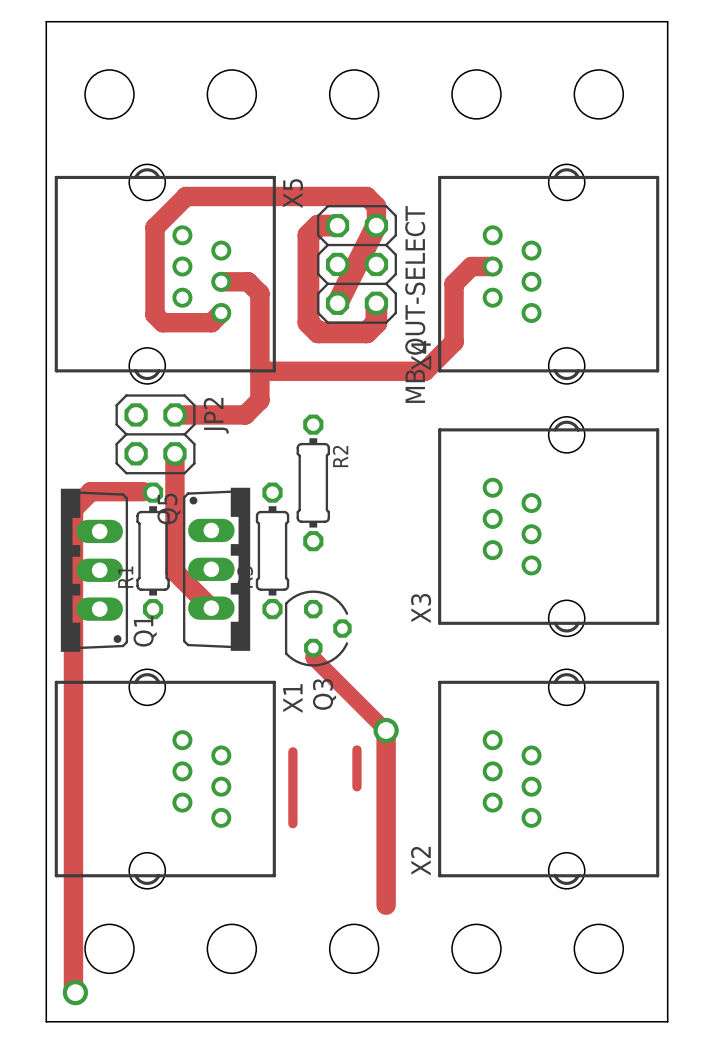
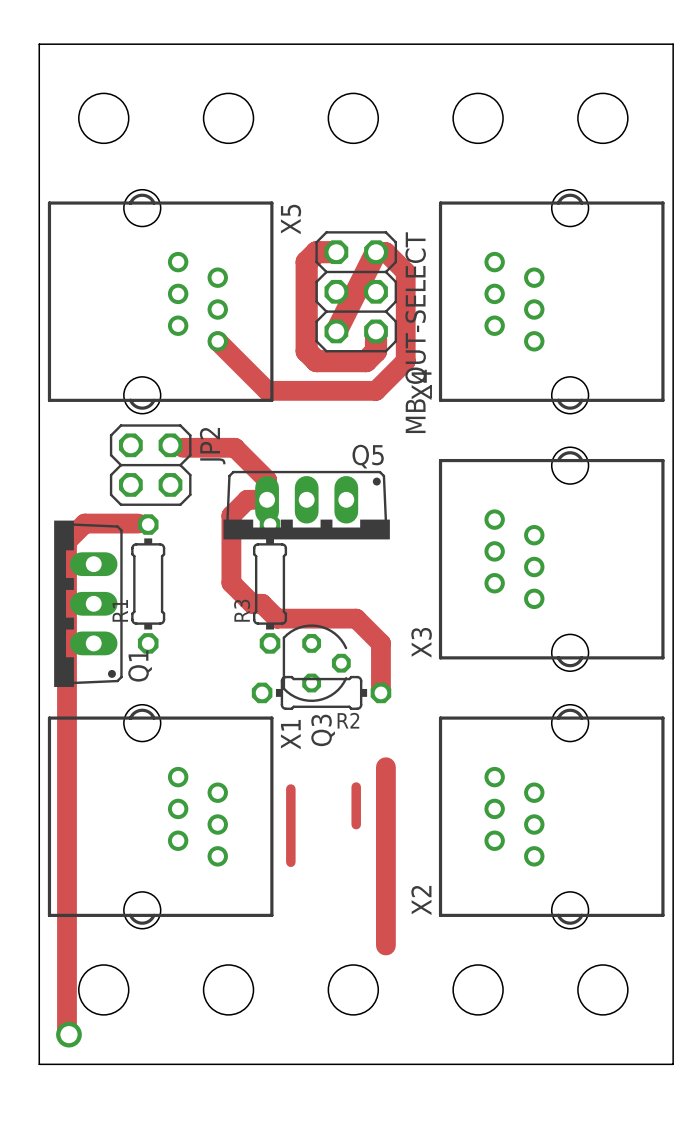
track: (376, 225) (376, 206) (366, 196) (186, 196) (155, 227) (155, 314) (162, 322) (211, 322) (221, 312) -> (376, 252) (385, 252) (405, 271) (405, 361) (376, 390) (267, 390) (217, 341)
track: (492, 266) (471, 266) (454, 283) (454, 342) (424, 371) (259, 371) -> none
track: (221, 281) (248, 281) (259, 293) (259, 400) (245, 414) (174, 414) -> none
track: none -> (182, 447) (234, 447) (267, 479) (267, 499) (247, 499) (231, 515) (231, 582) (252, 603) (262, 603) (276, 618) (356, 618) (380, 643) (380, 692)
track: (174, 453) (174, 571) (211, 608) -> none
R2 rotation: 0° (313, 482) -> 90° clockwise (321, 692)
R2 position: (313, 482) -> (321, 692)
Q5 rotation: 0° (216, 569) -> 90° clockwise (306, 505)
Q5 position: (216, 569) -> (306, 505)
track: (313, 647) (313, 657) (386, 730) -> none
via: (386, 730) -> none

